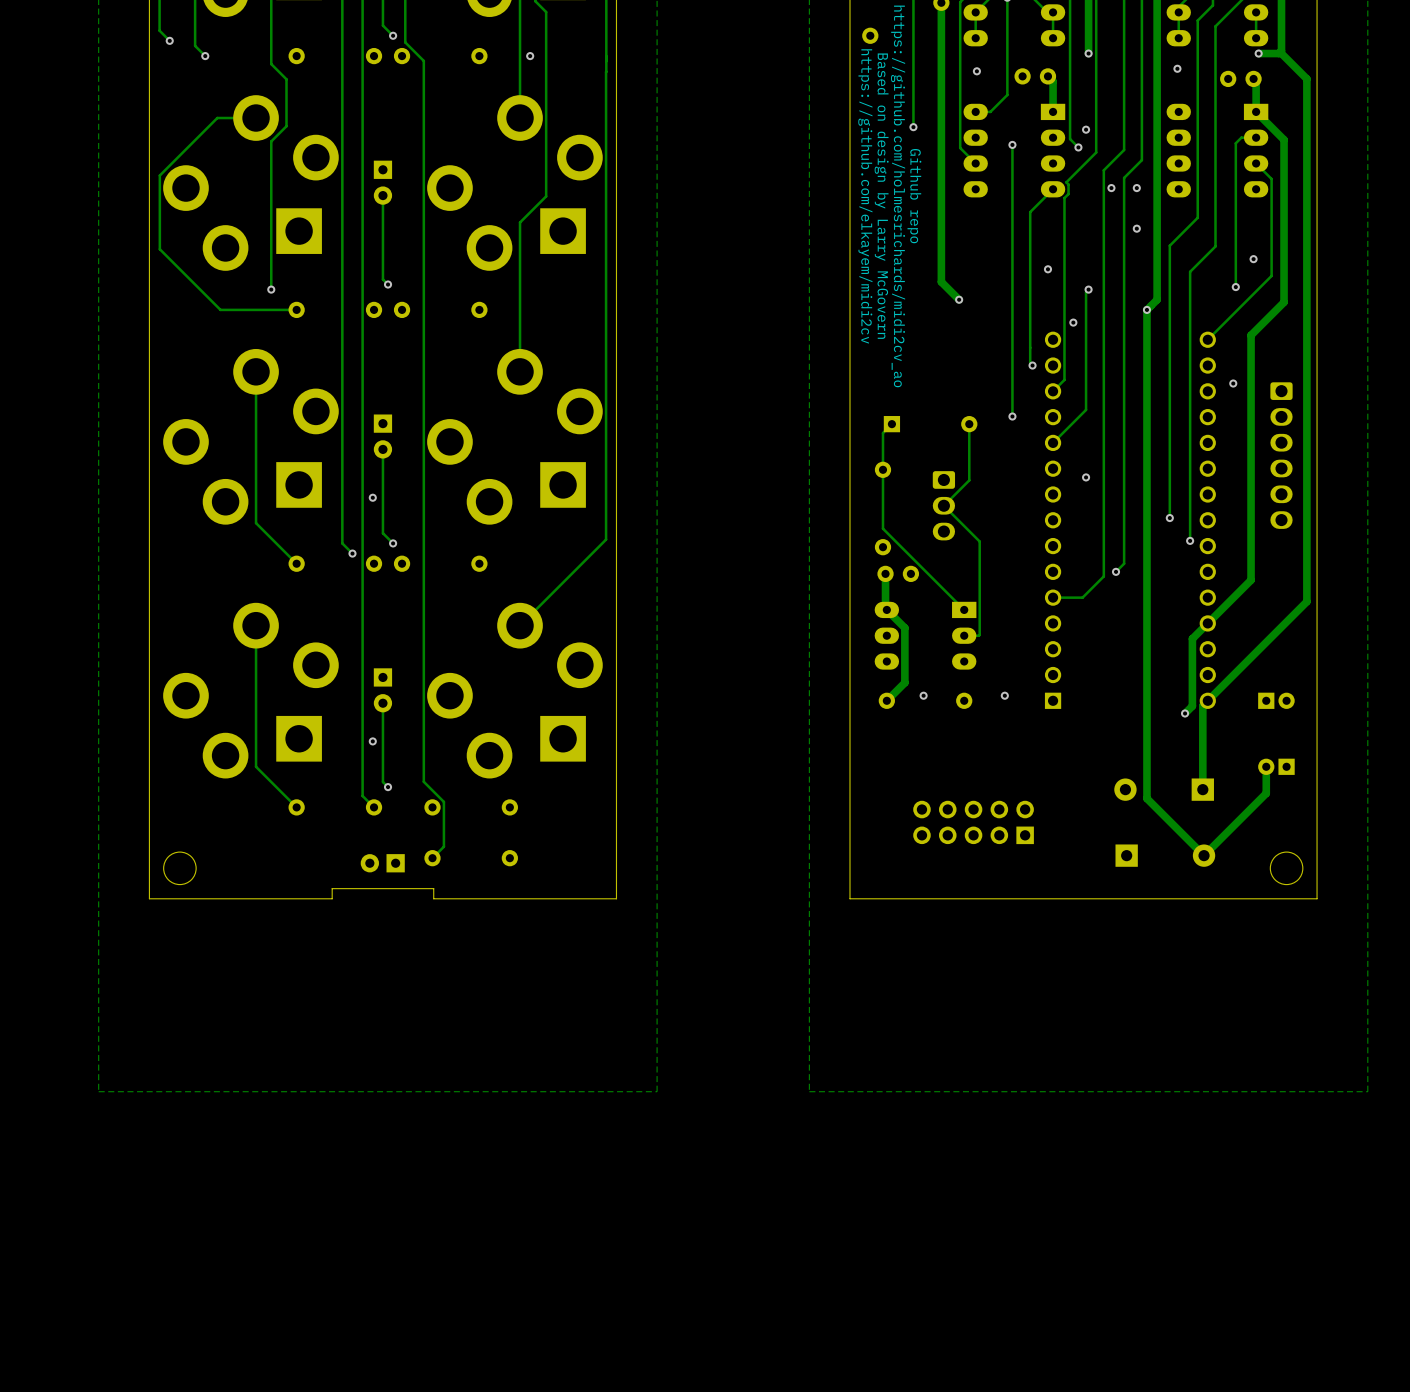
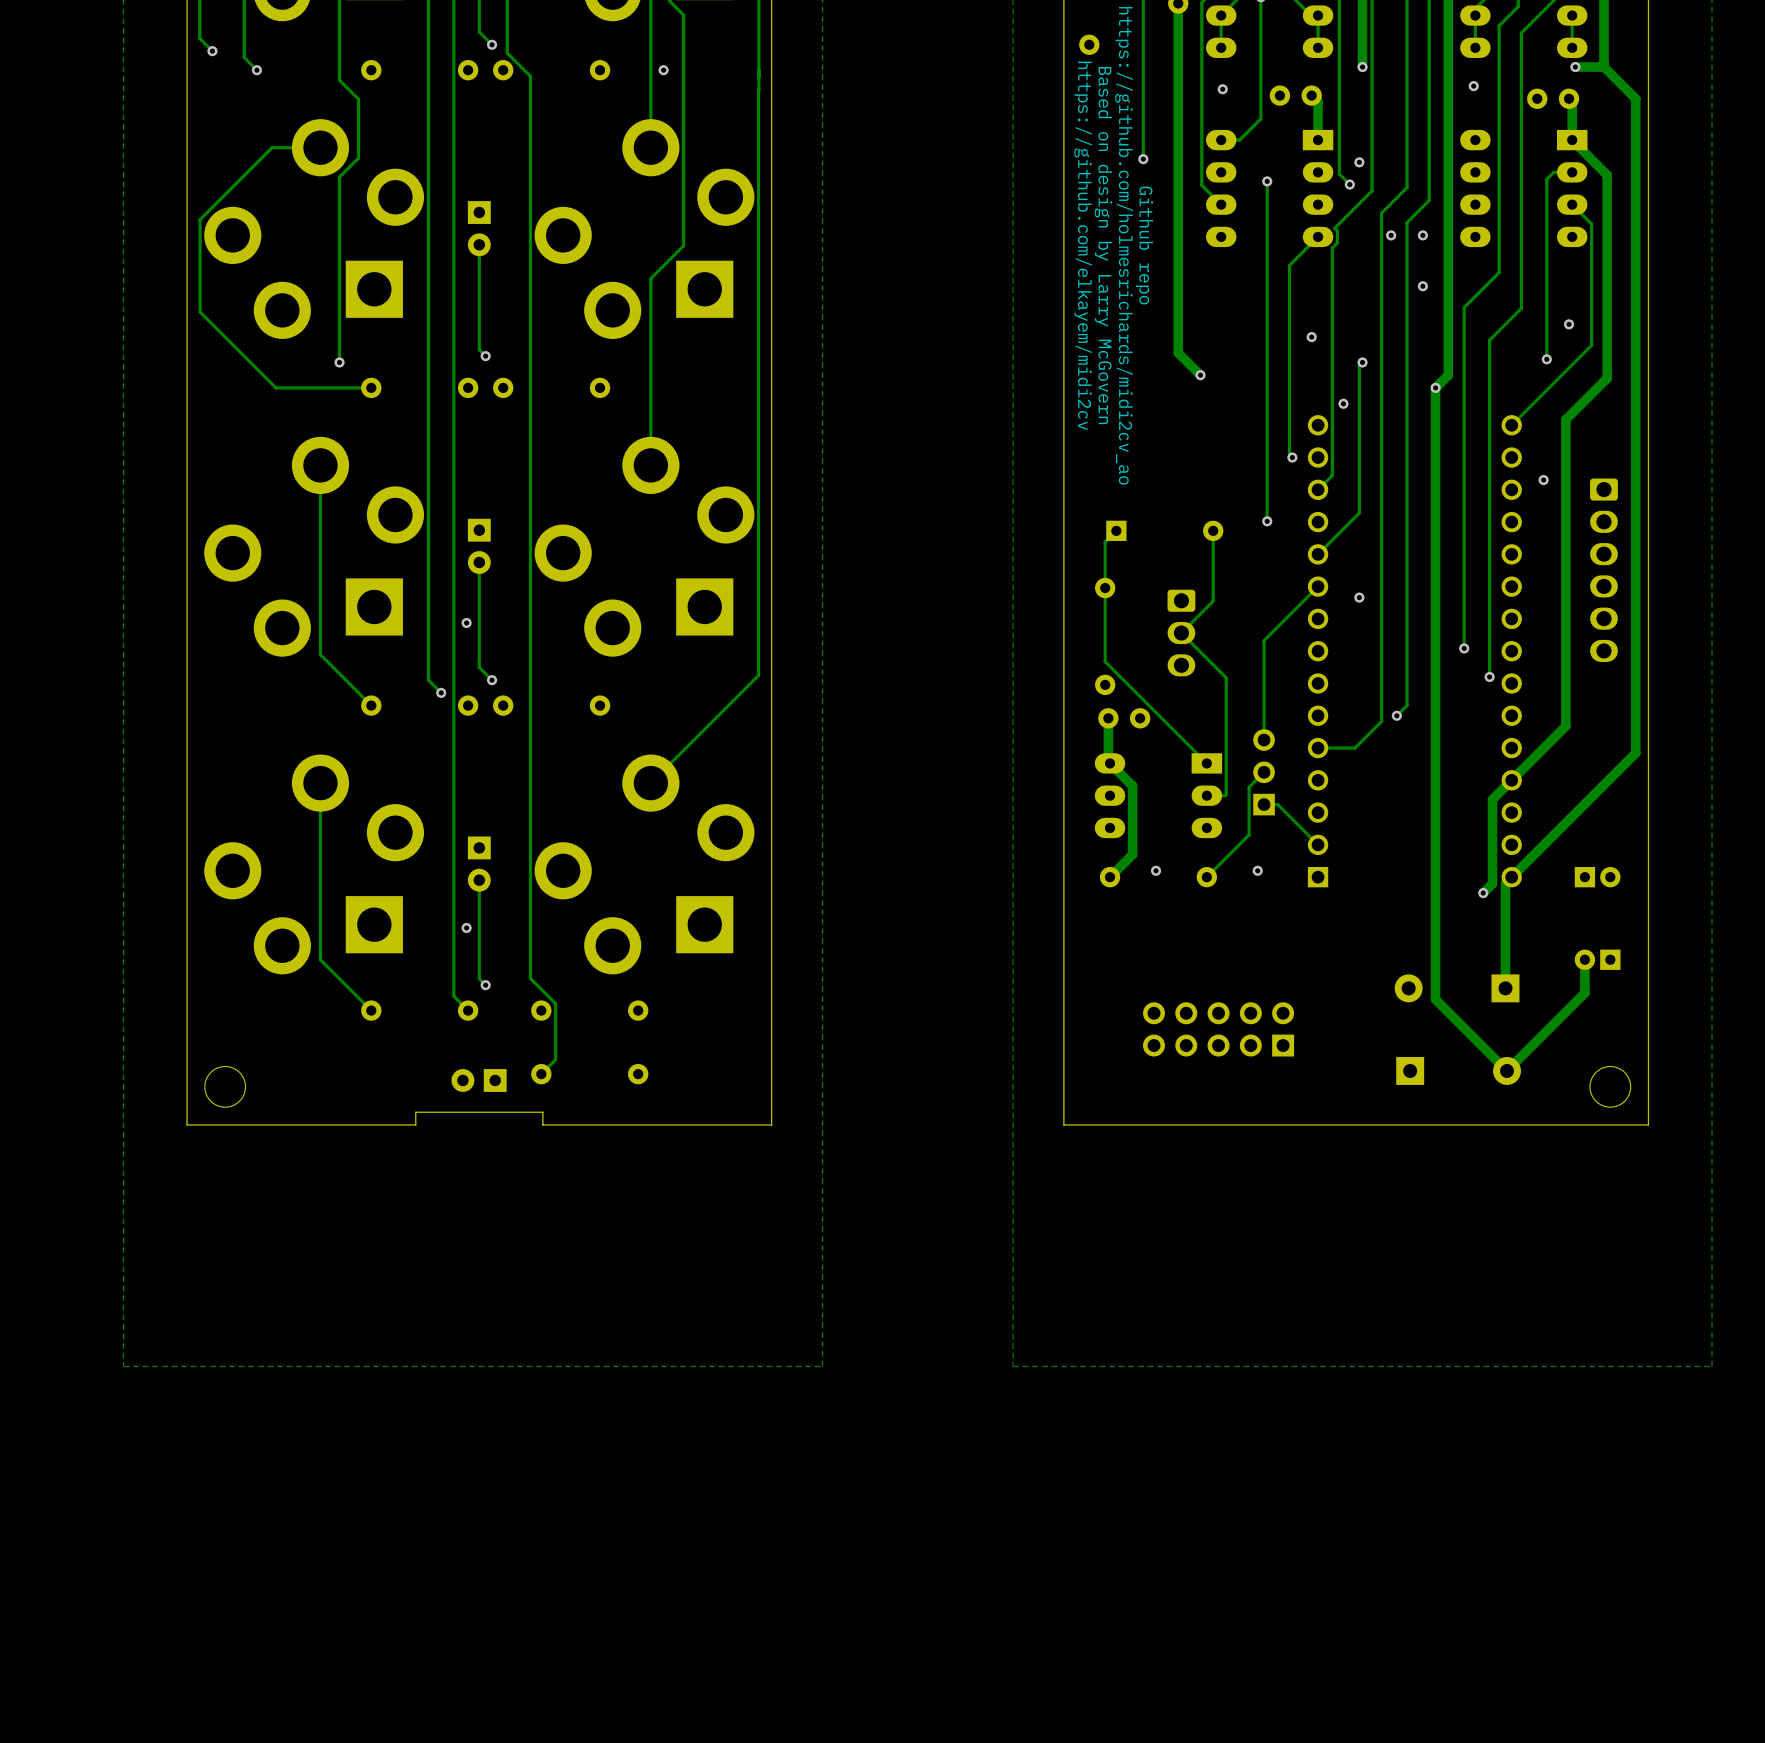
track: none -> (1318, 586) (1264, 640) (1264, 740)
track: none -> (1264, 772) (1249, 787) (1249, 834) (1206, 877)
part: none -> (1264, 772)
track: none -> (1264, 804) (1277, 804) (1318, 844)

